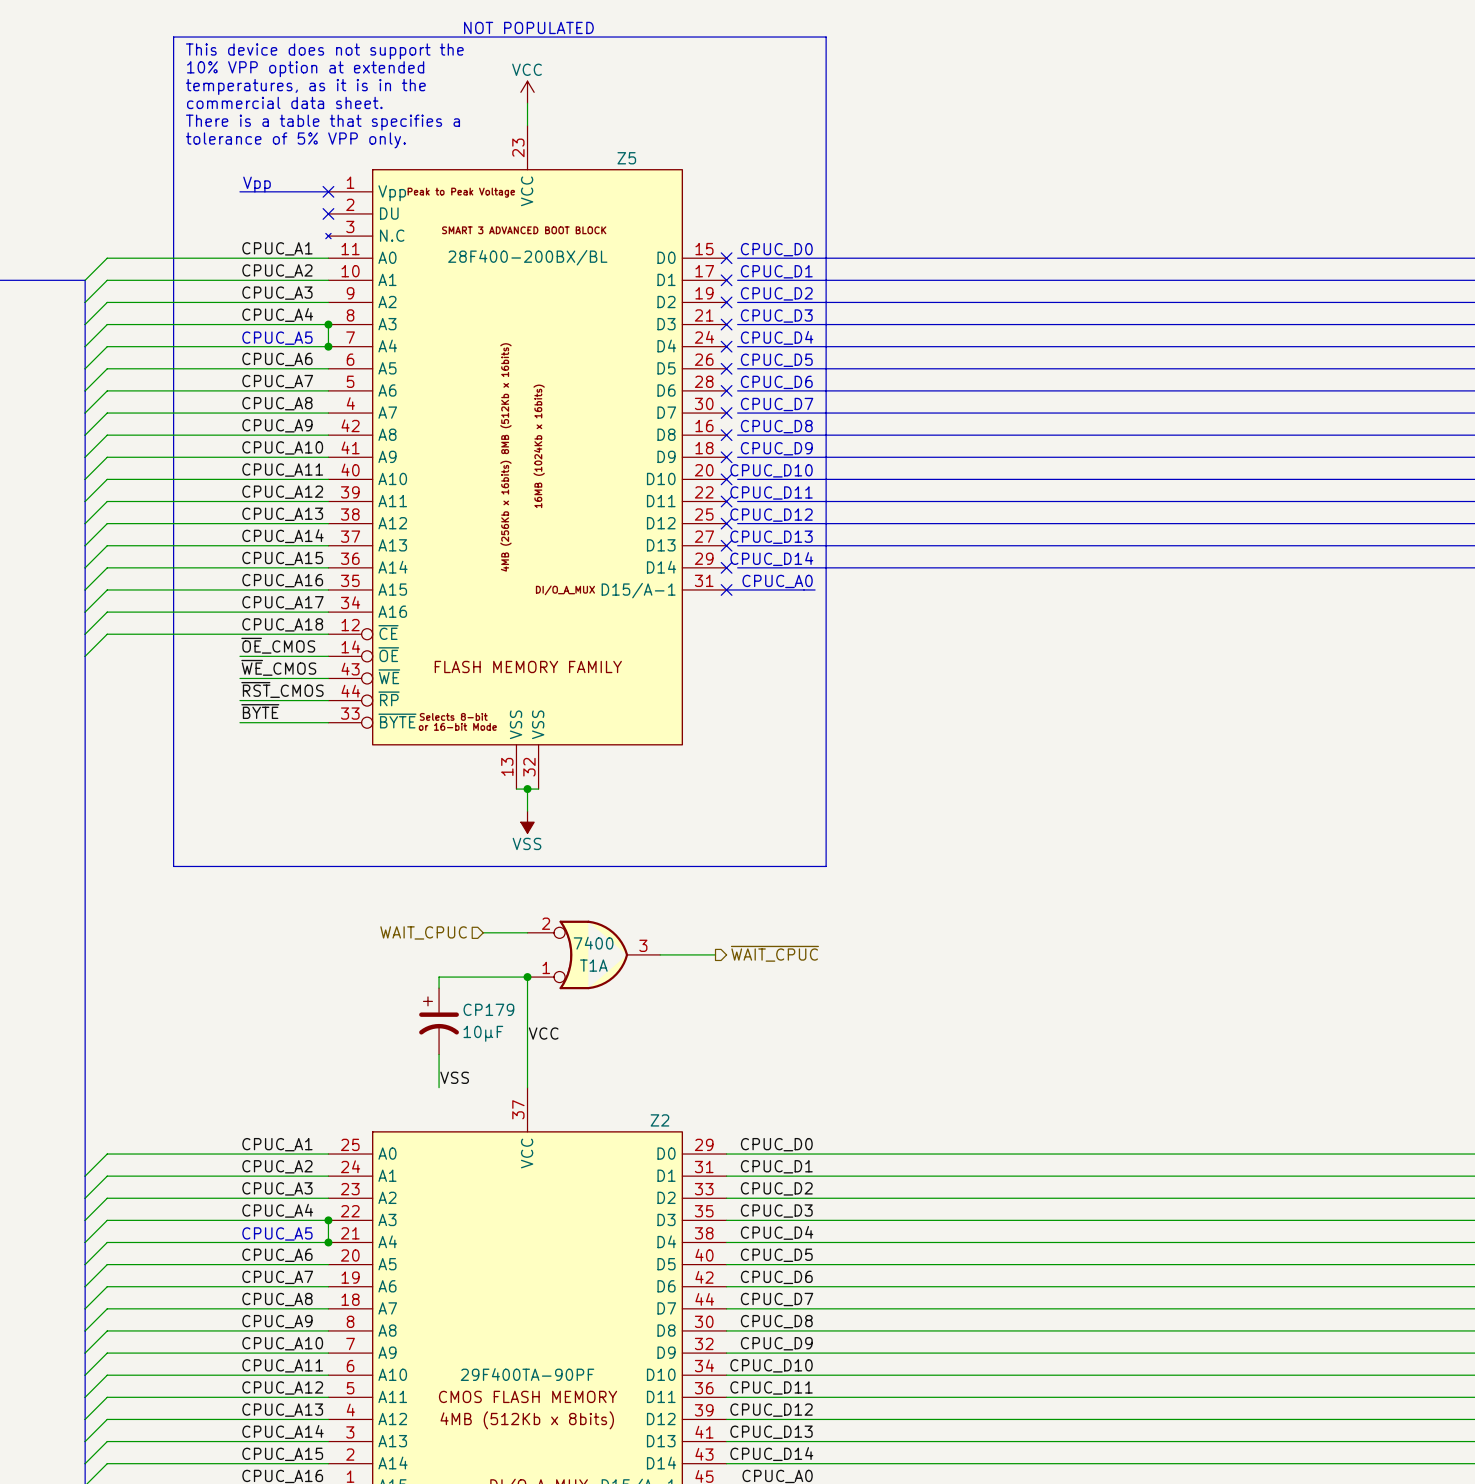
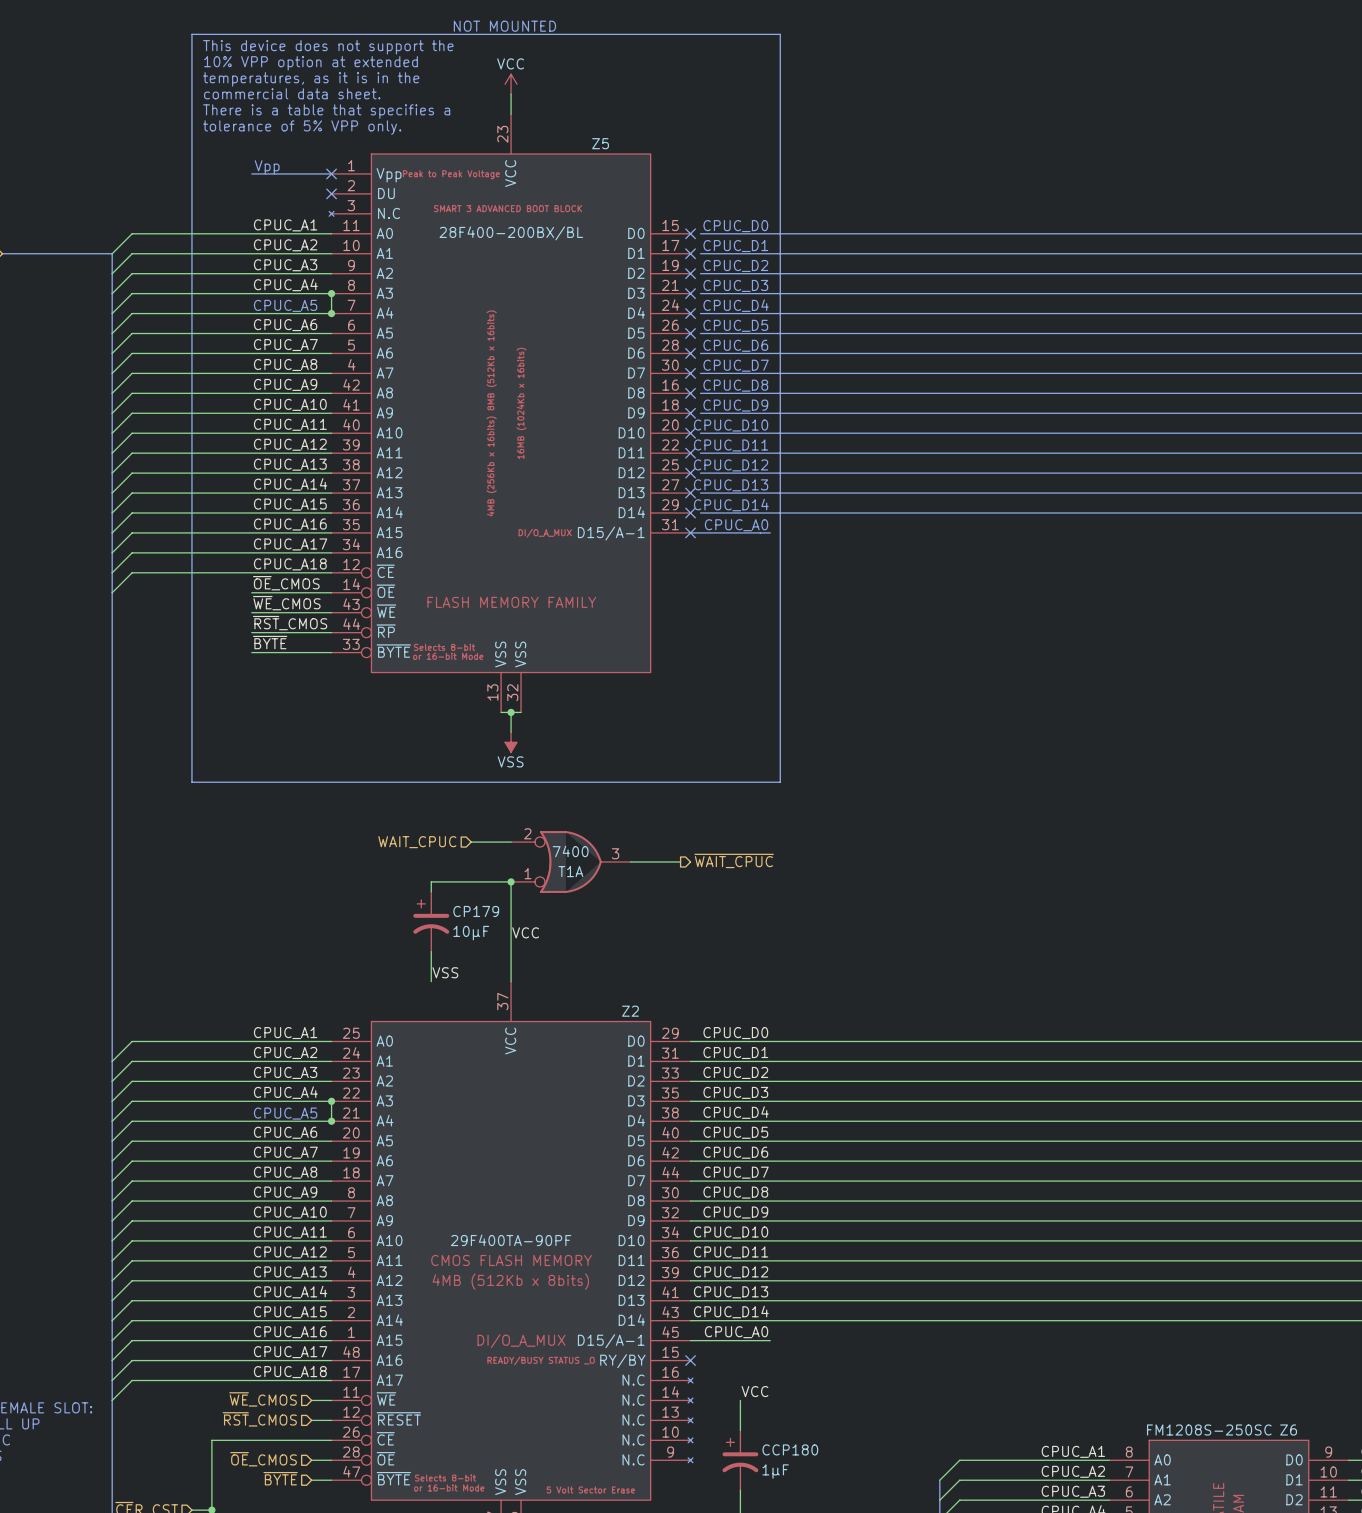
text: NOT POPULATED (528, 27) -> NOT MOUNTED (504, 26)

